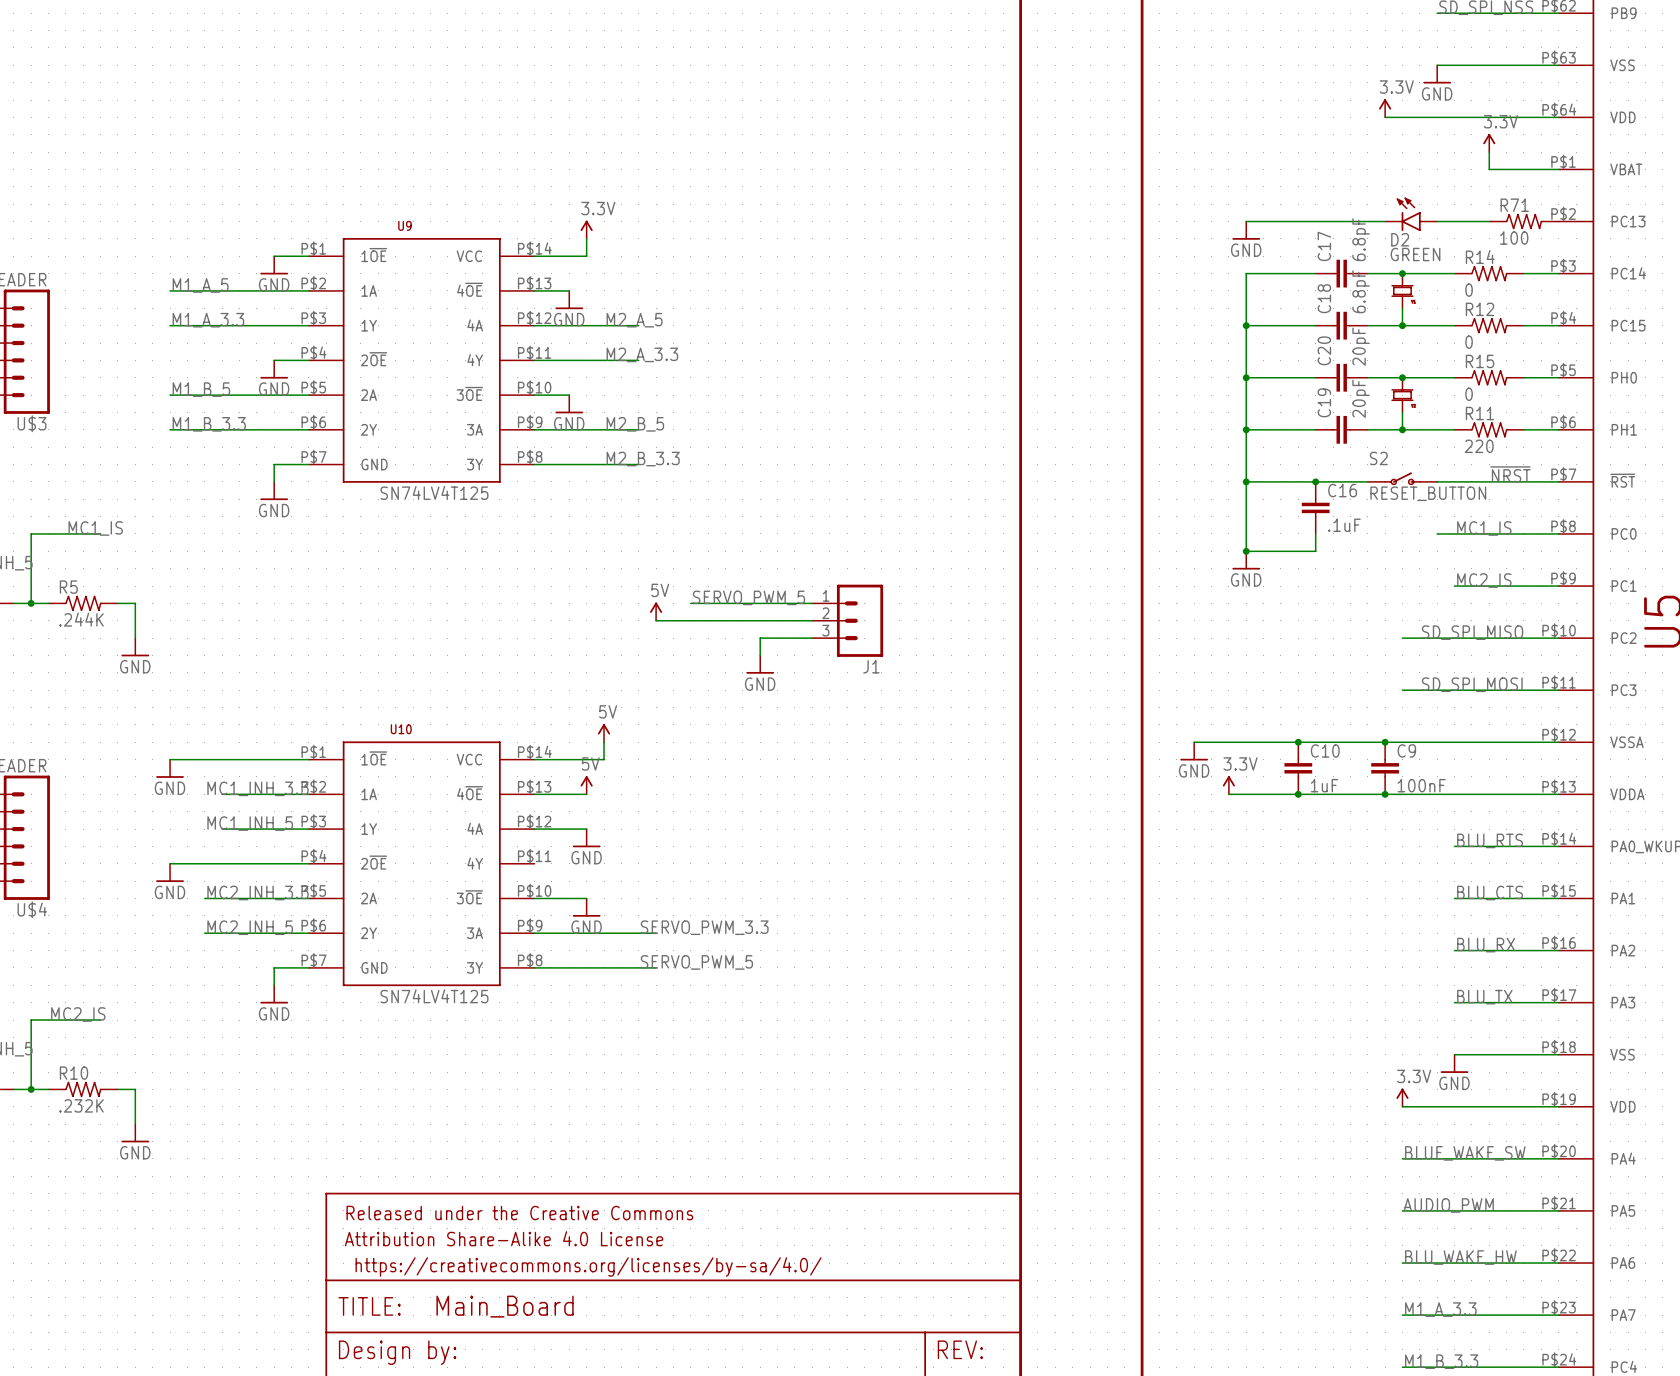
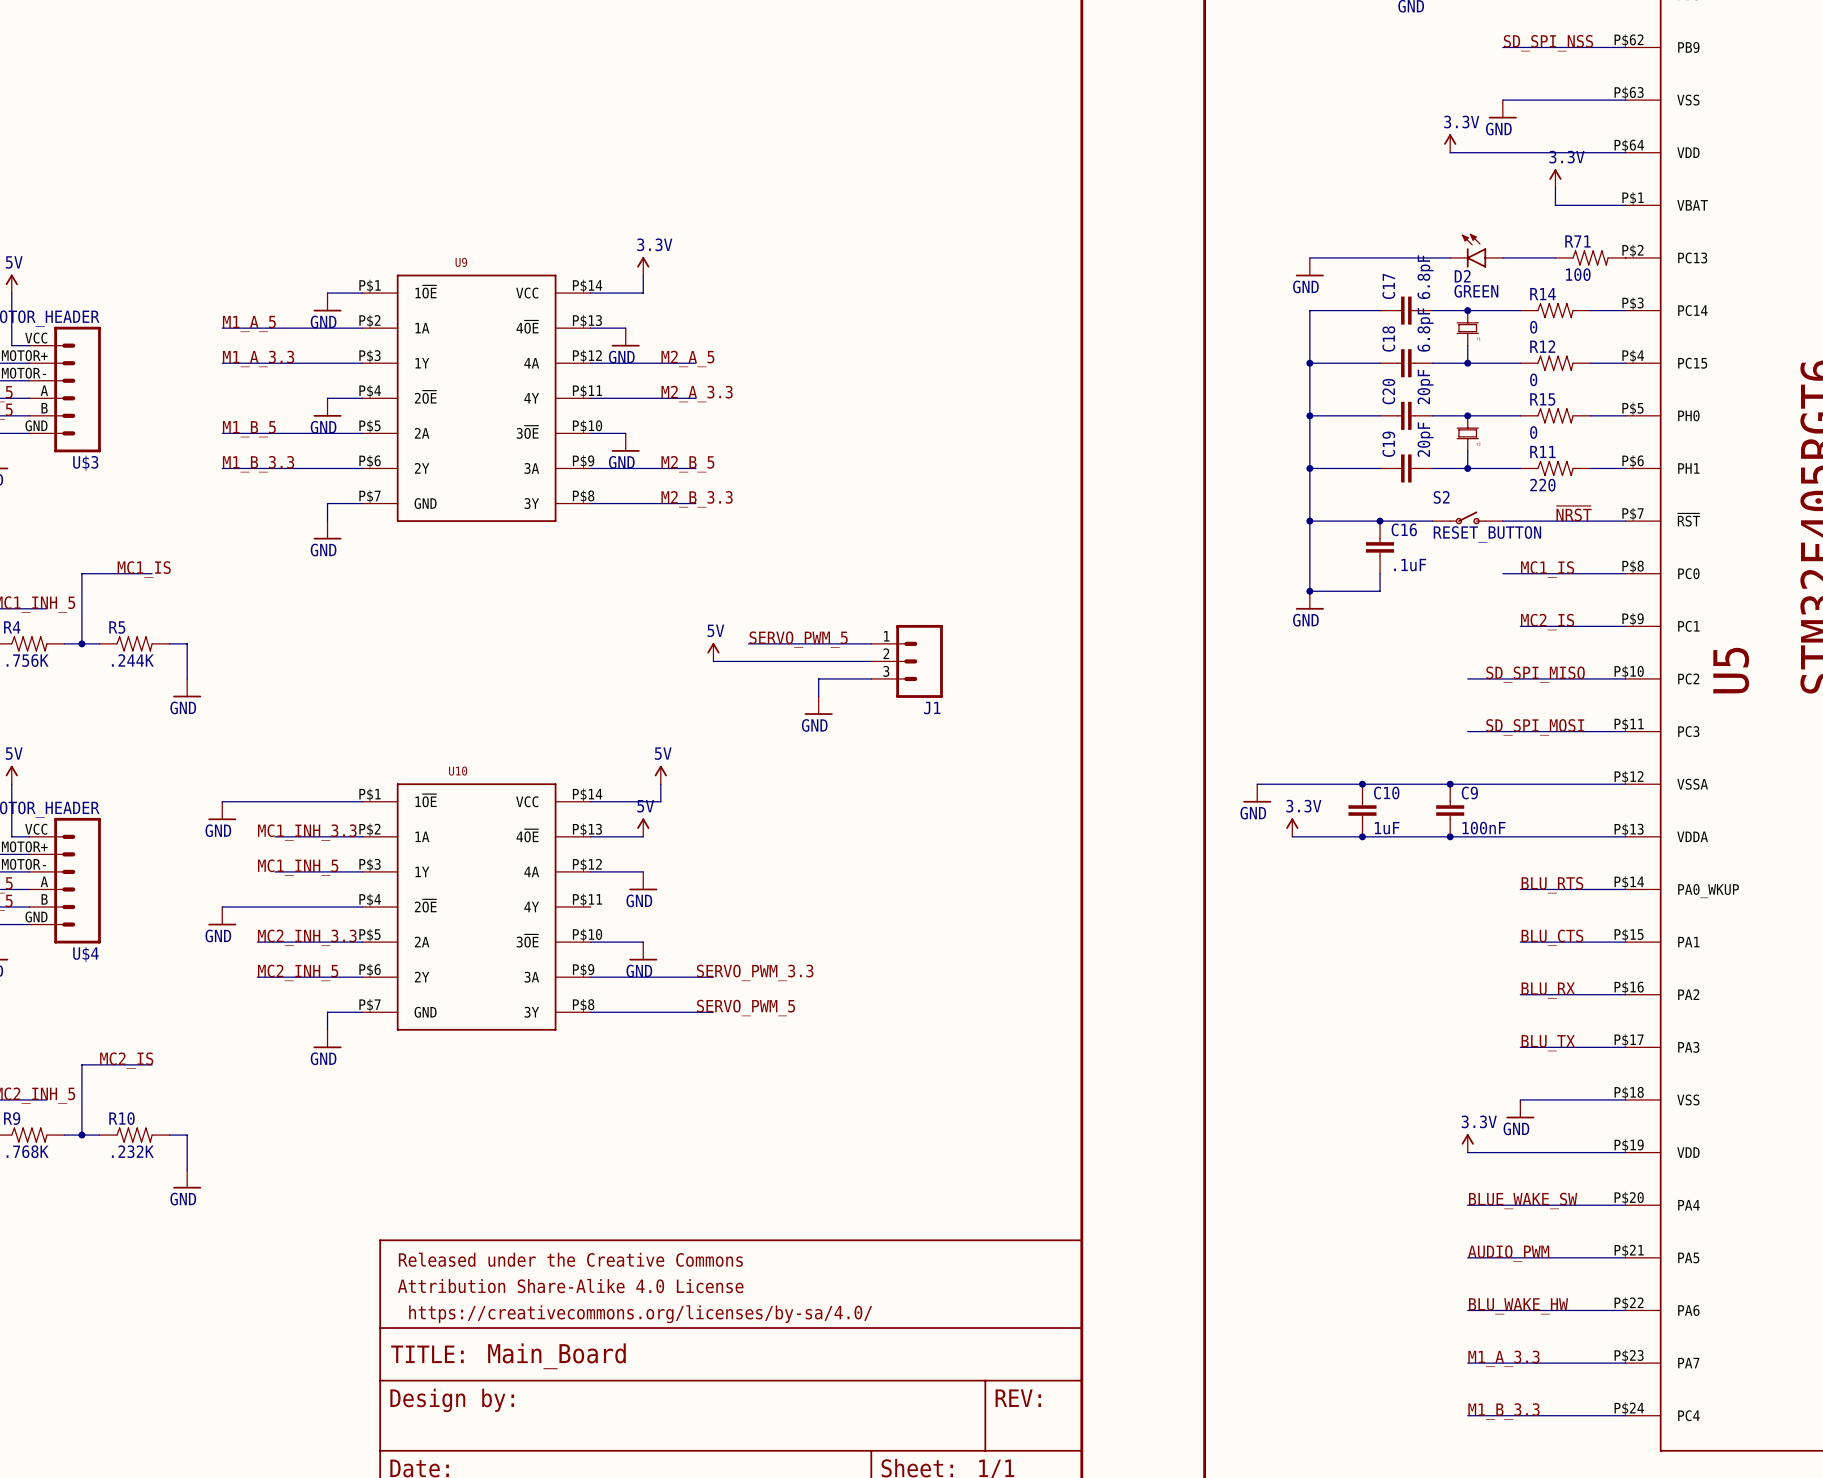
U9 value: SN74LV4T125 (434, 492) -> none
U10 value: SN74LV4T125 (434, 996) -> none

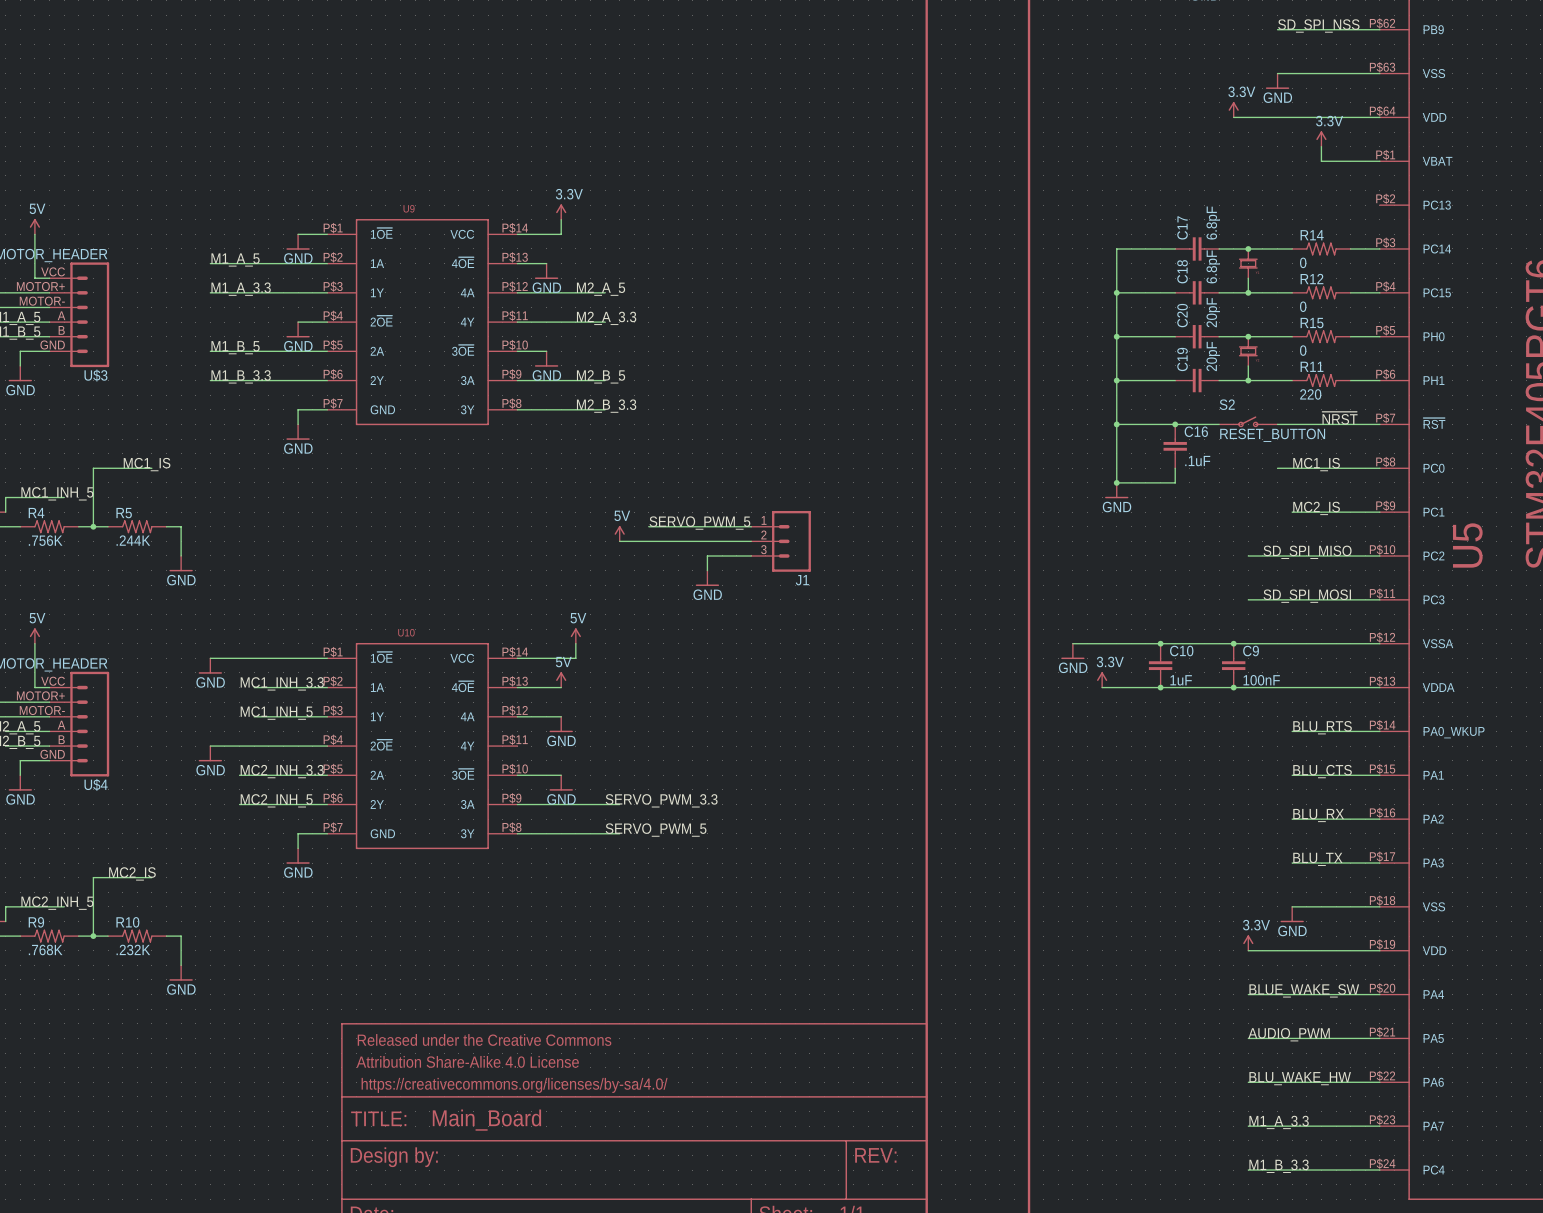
D2: GREEN (1476, 250) -> none
wire: (1309, 257) (1450, 257) -> none
wire: (1502, 257) (1555, 257) -> none
R71: 100 (1590, 257) -> none
power symbol: GND (1309, 267) -> none

